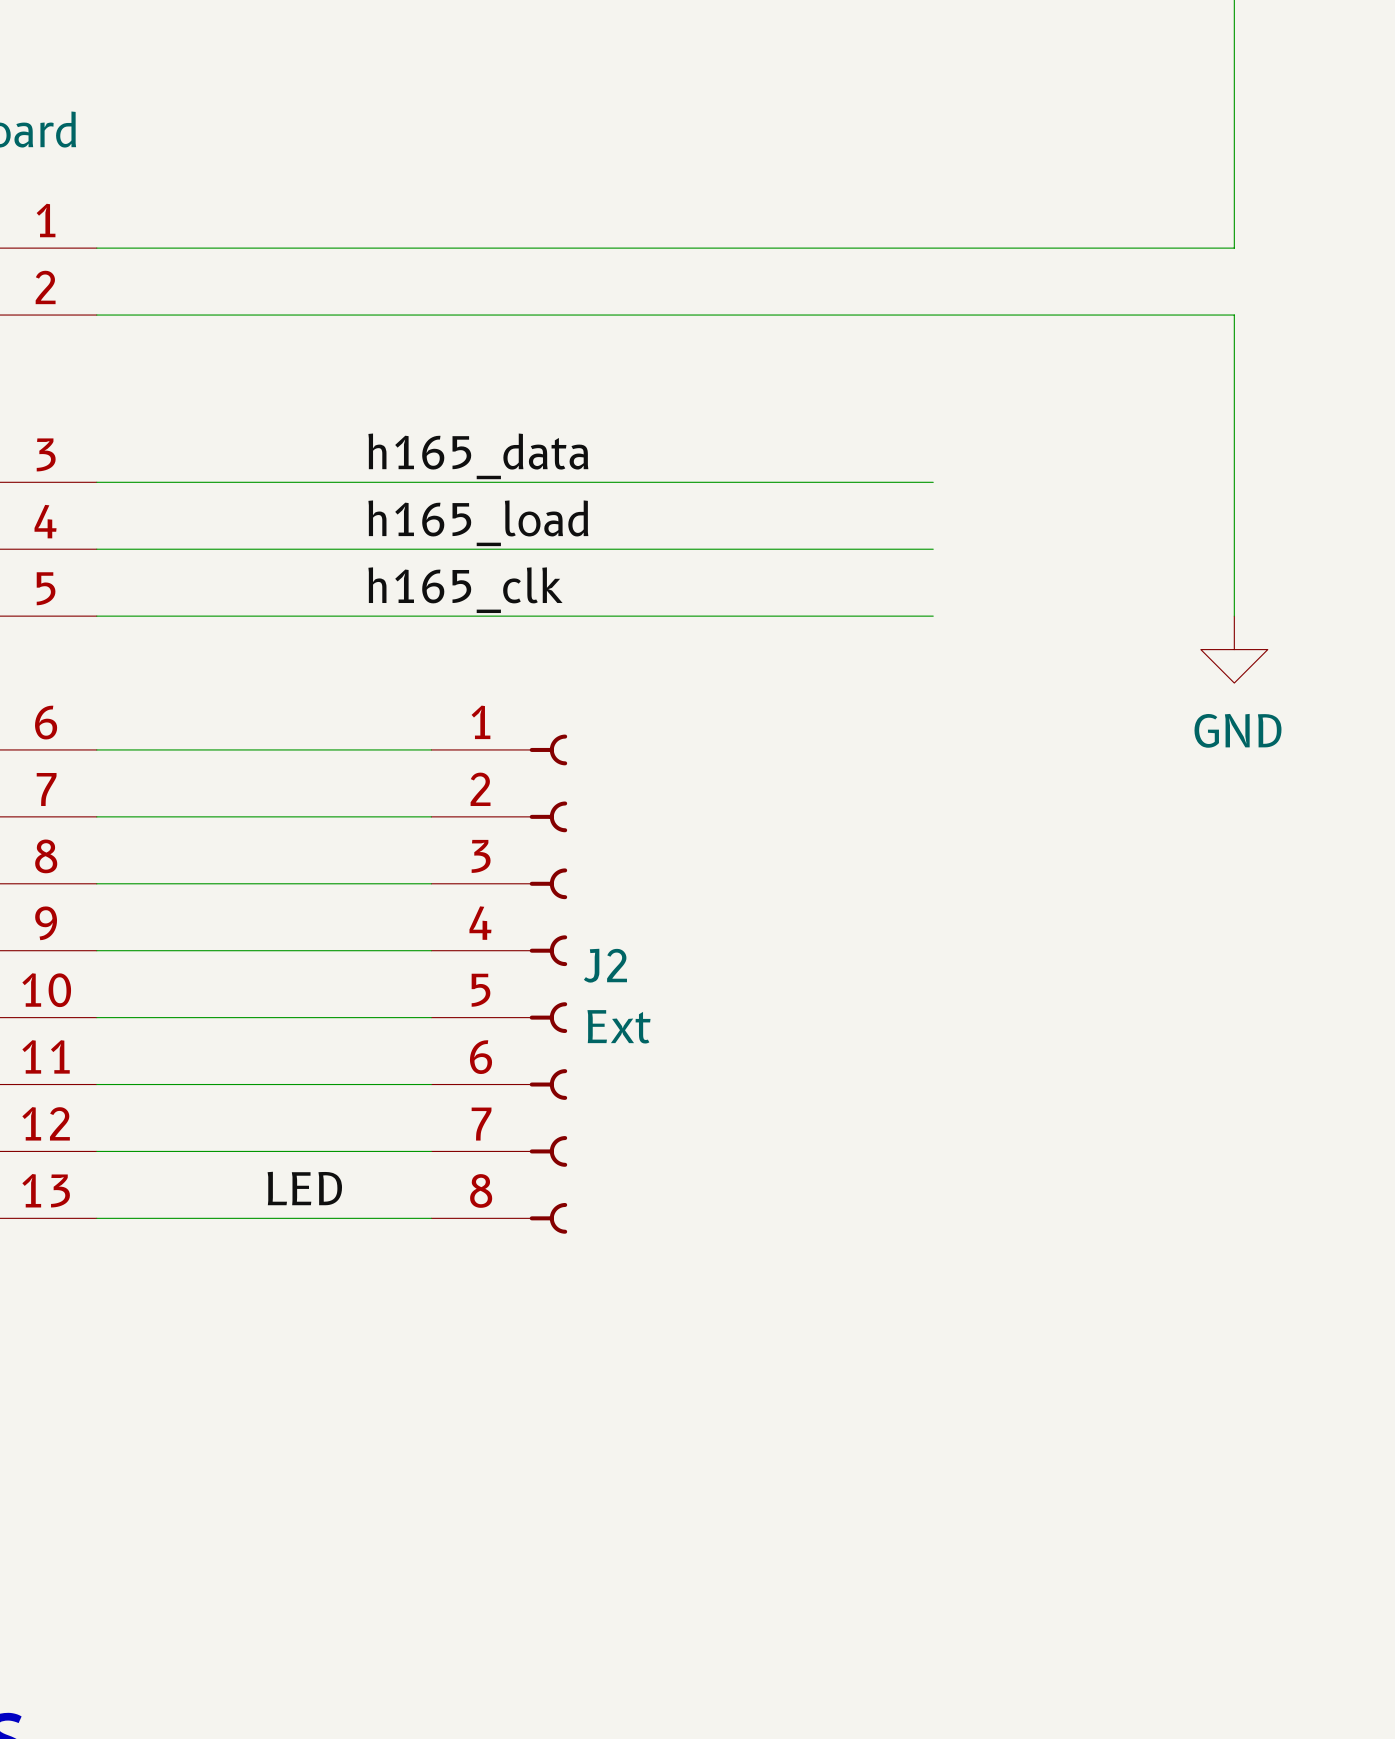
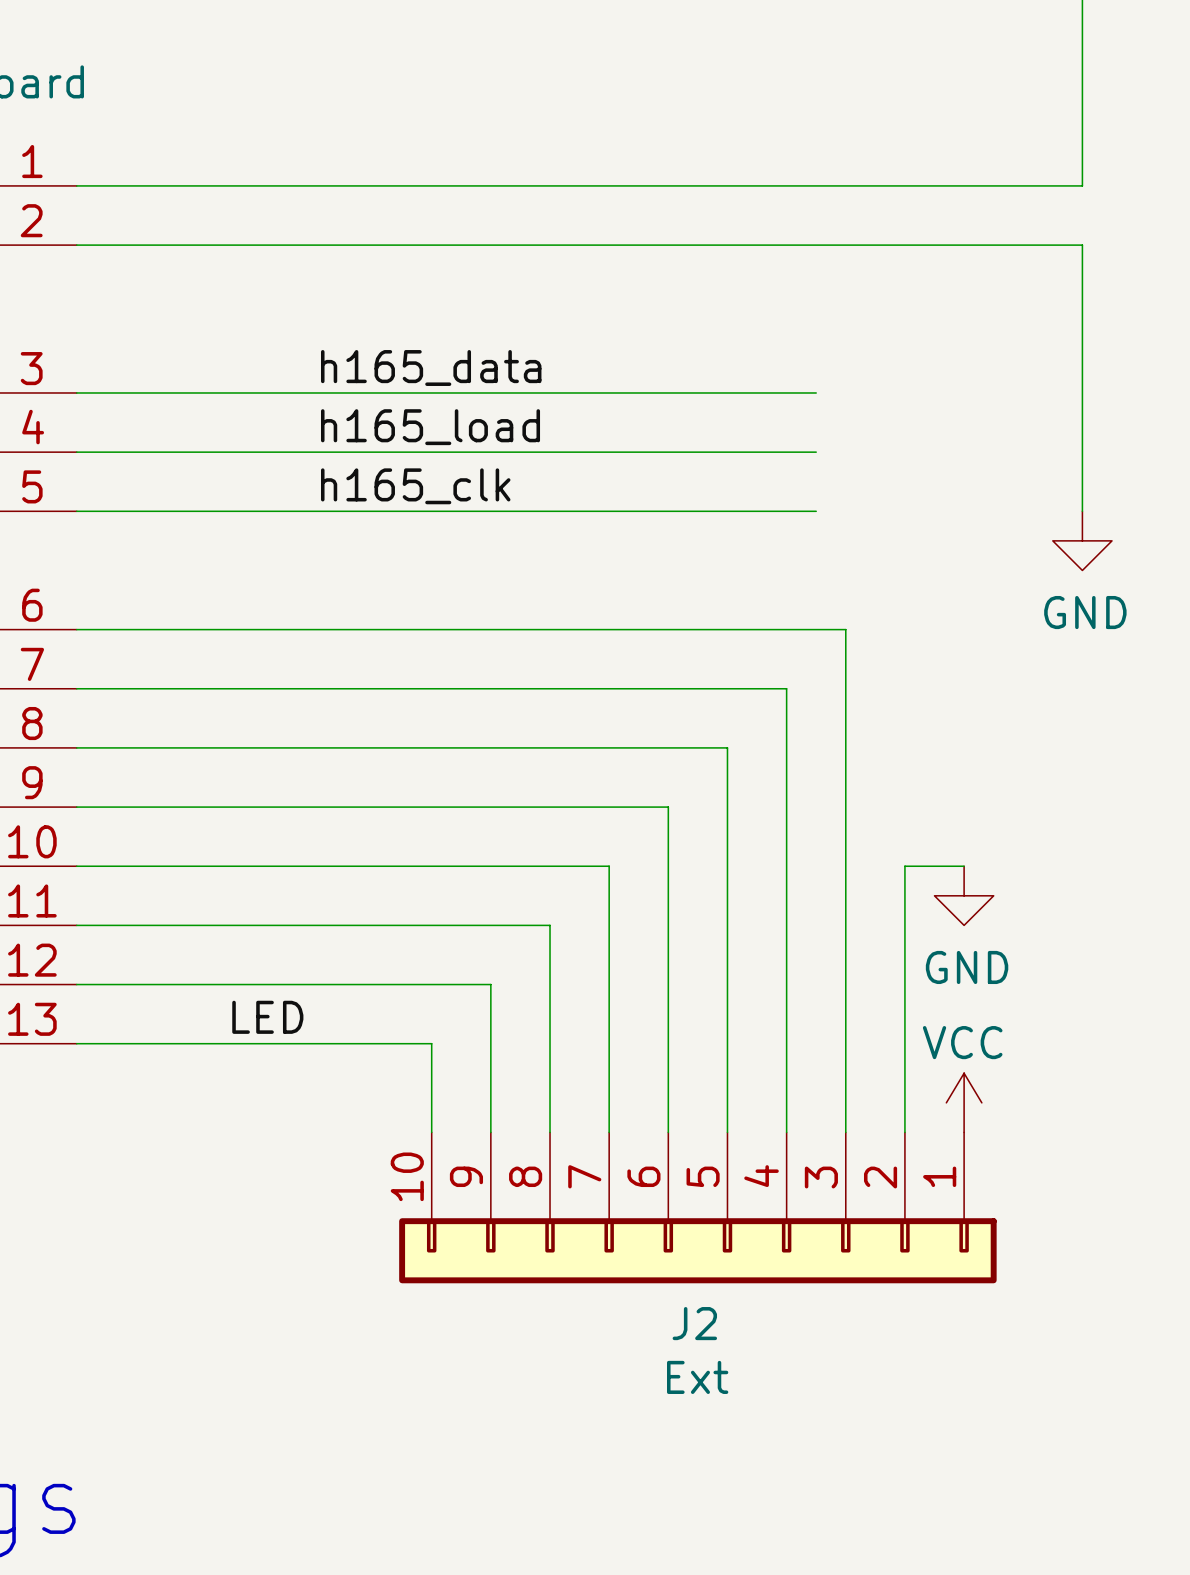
J2 symbol: [431, 734, 568, 1234] -> [399, 1132, 997, 1284]
wire: none -> (372, 629) (845, 629) (845, 1132)
wire: none -> (372, 688) (786, 688) (786, 1132)
wire: none -> (372, 747) (727, 747) (727, 1132)
wire: none -> (372, 807) (668, 807) (668, 1132)
J2 name position: J2 (605, 965) -> J2 (694, 1323)
wire: none -> (372, 866) (609, 866) (609, 1132)
wire: none -> (964, 866) (904, 866) (904, 1132)
J2 value position: Ext (618, 1026) -> Ext (697, 1377)
power symbol: none -> GND (964, 895)
wire: none -> (372, 925) (550, 925) (550, 1132)
wire: none -> (372, 984) (490, 984) (490, 1132)
wire: none -> (372, 1043) (431, 1043) (431, 1132)
power symbol: none -> VCC (964, 1102)

